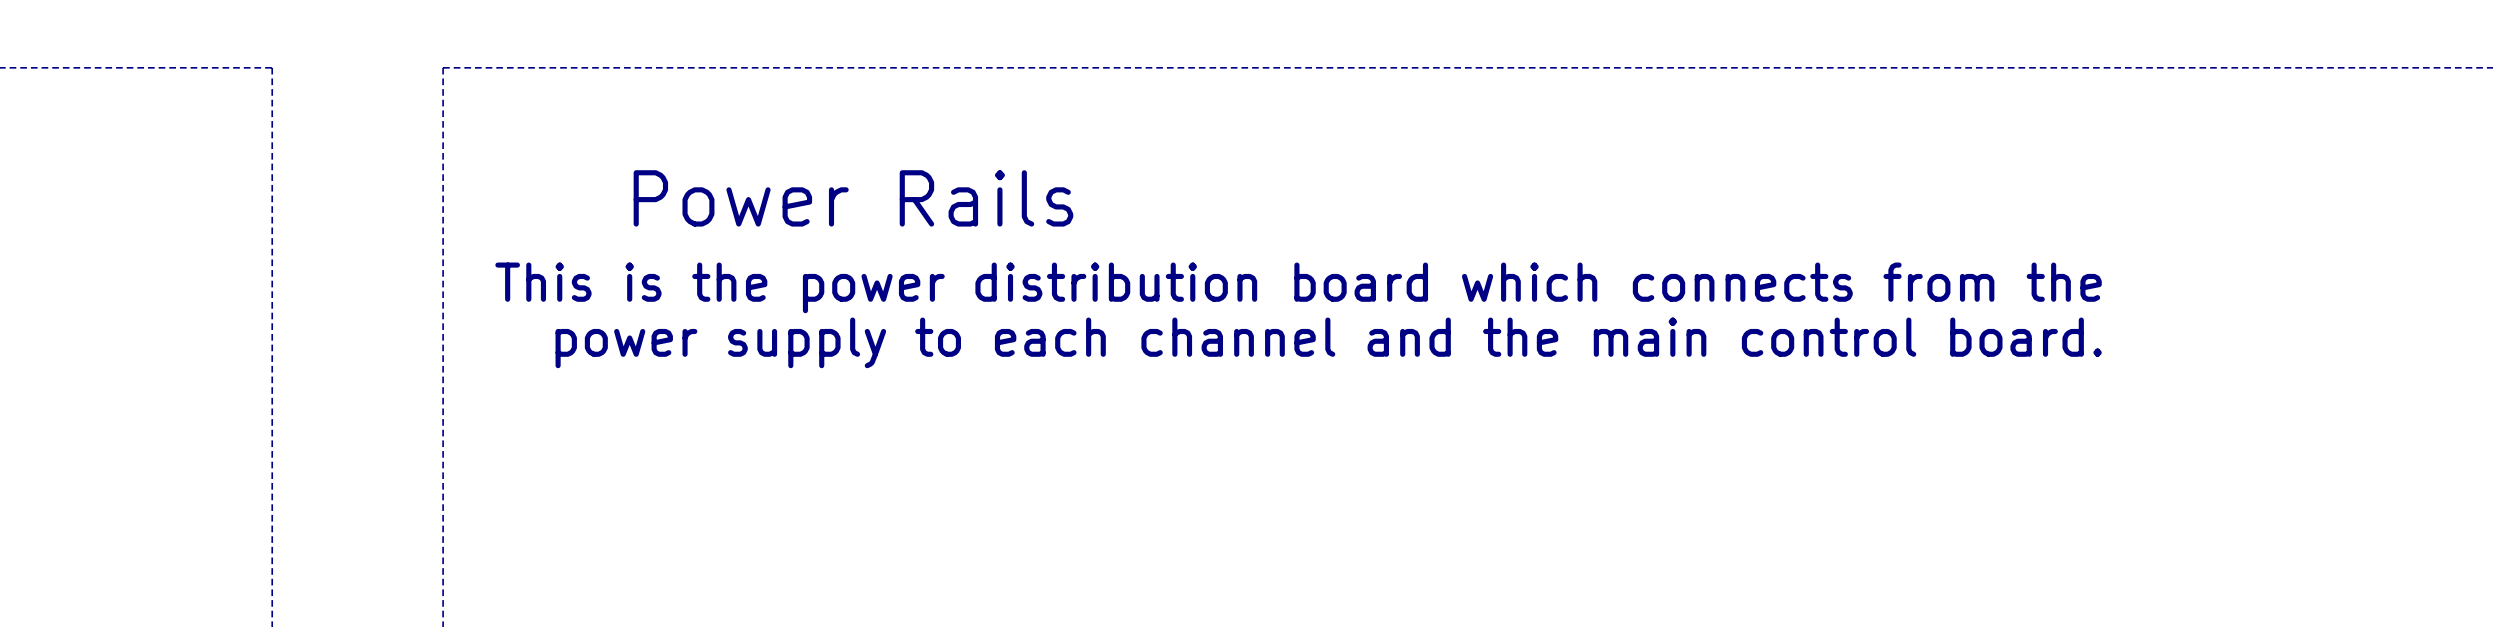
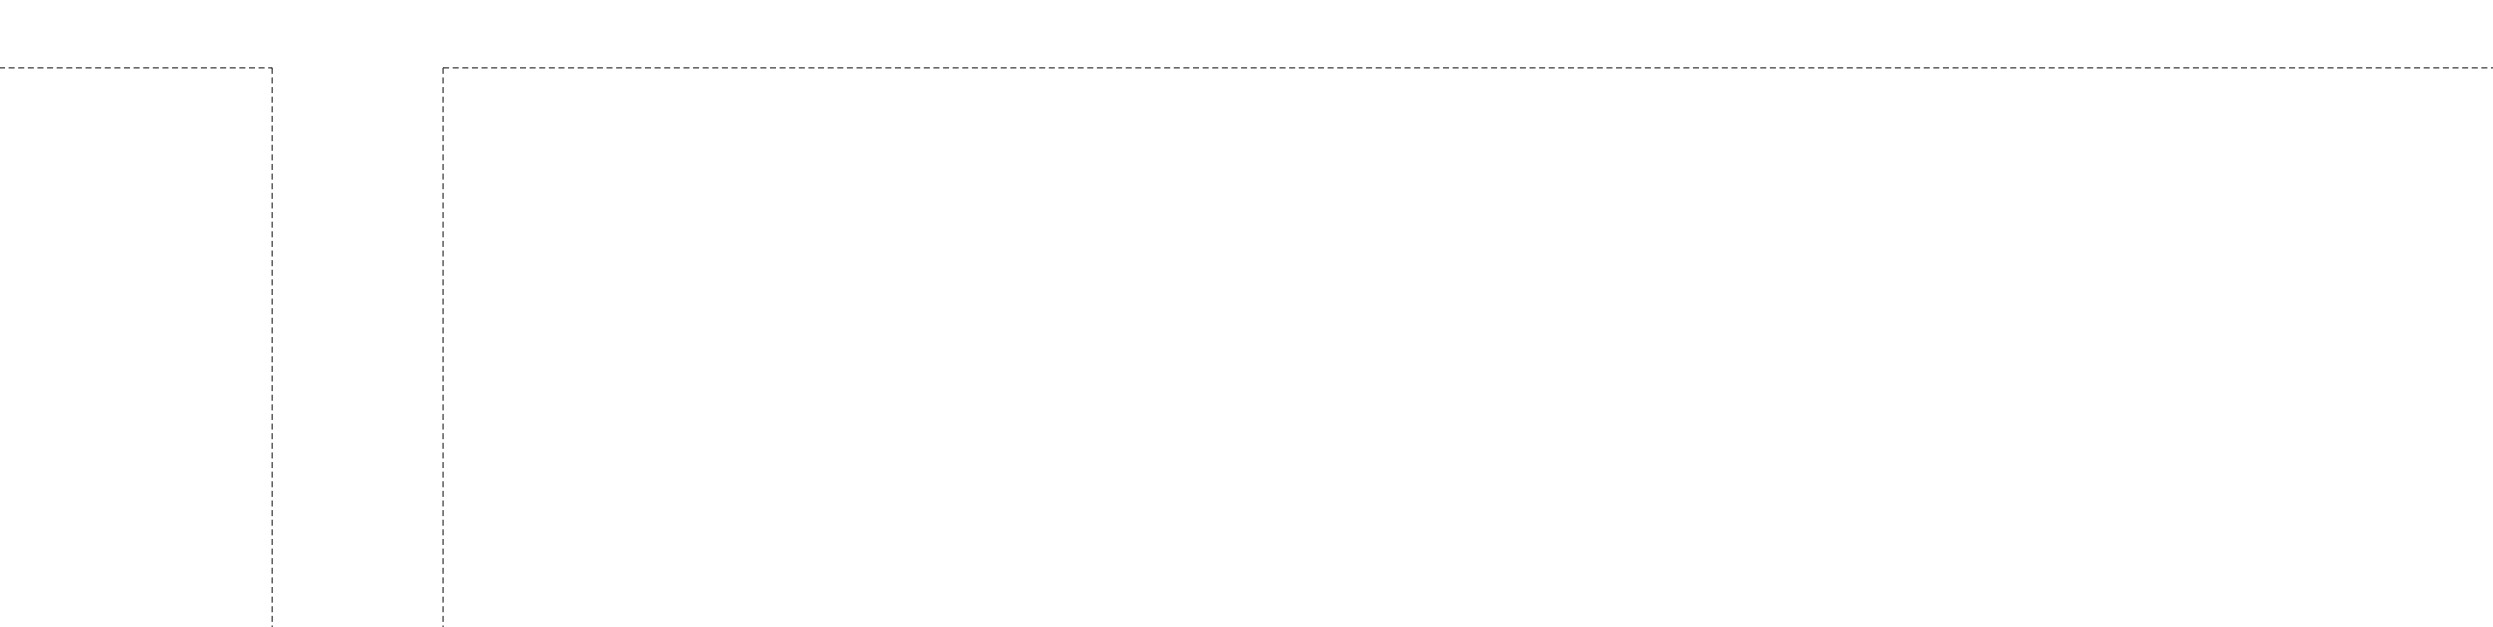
text: Power Rails (853, 198) -> none
text: This is the power distribution board which connects from the (1298, 287) -> none
text: power supply to each channel and the main control board. (1328, 342) -> none

